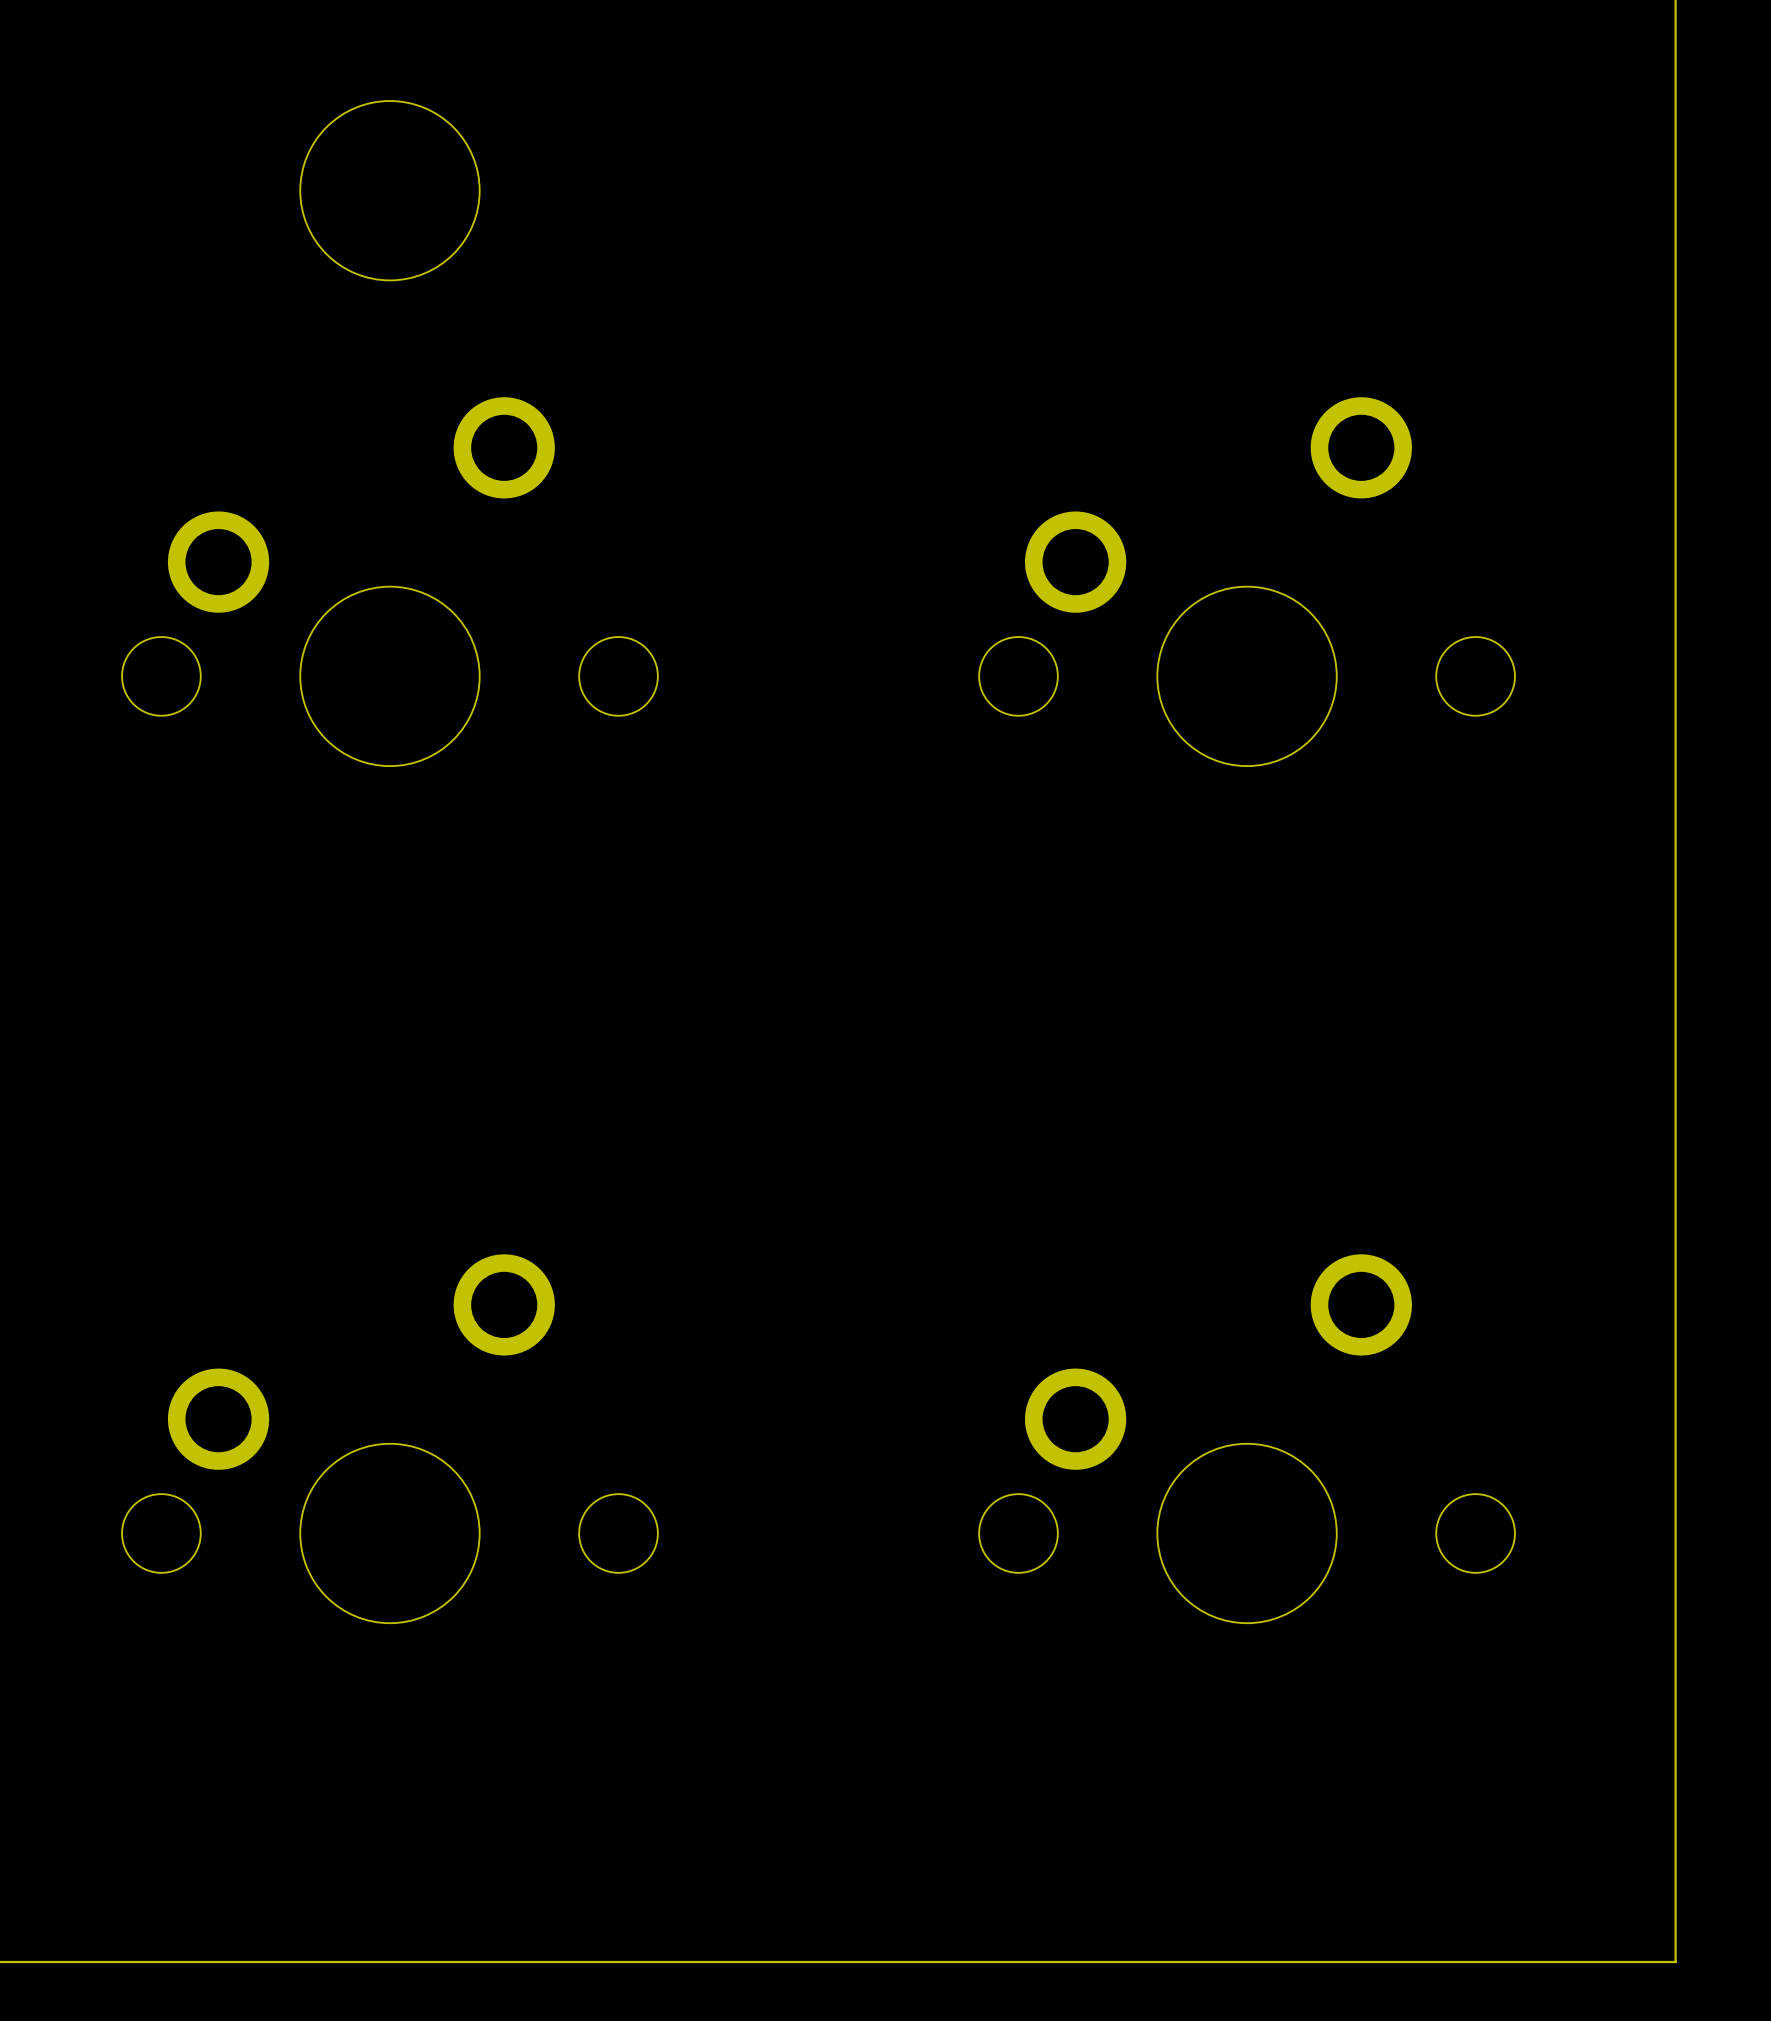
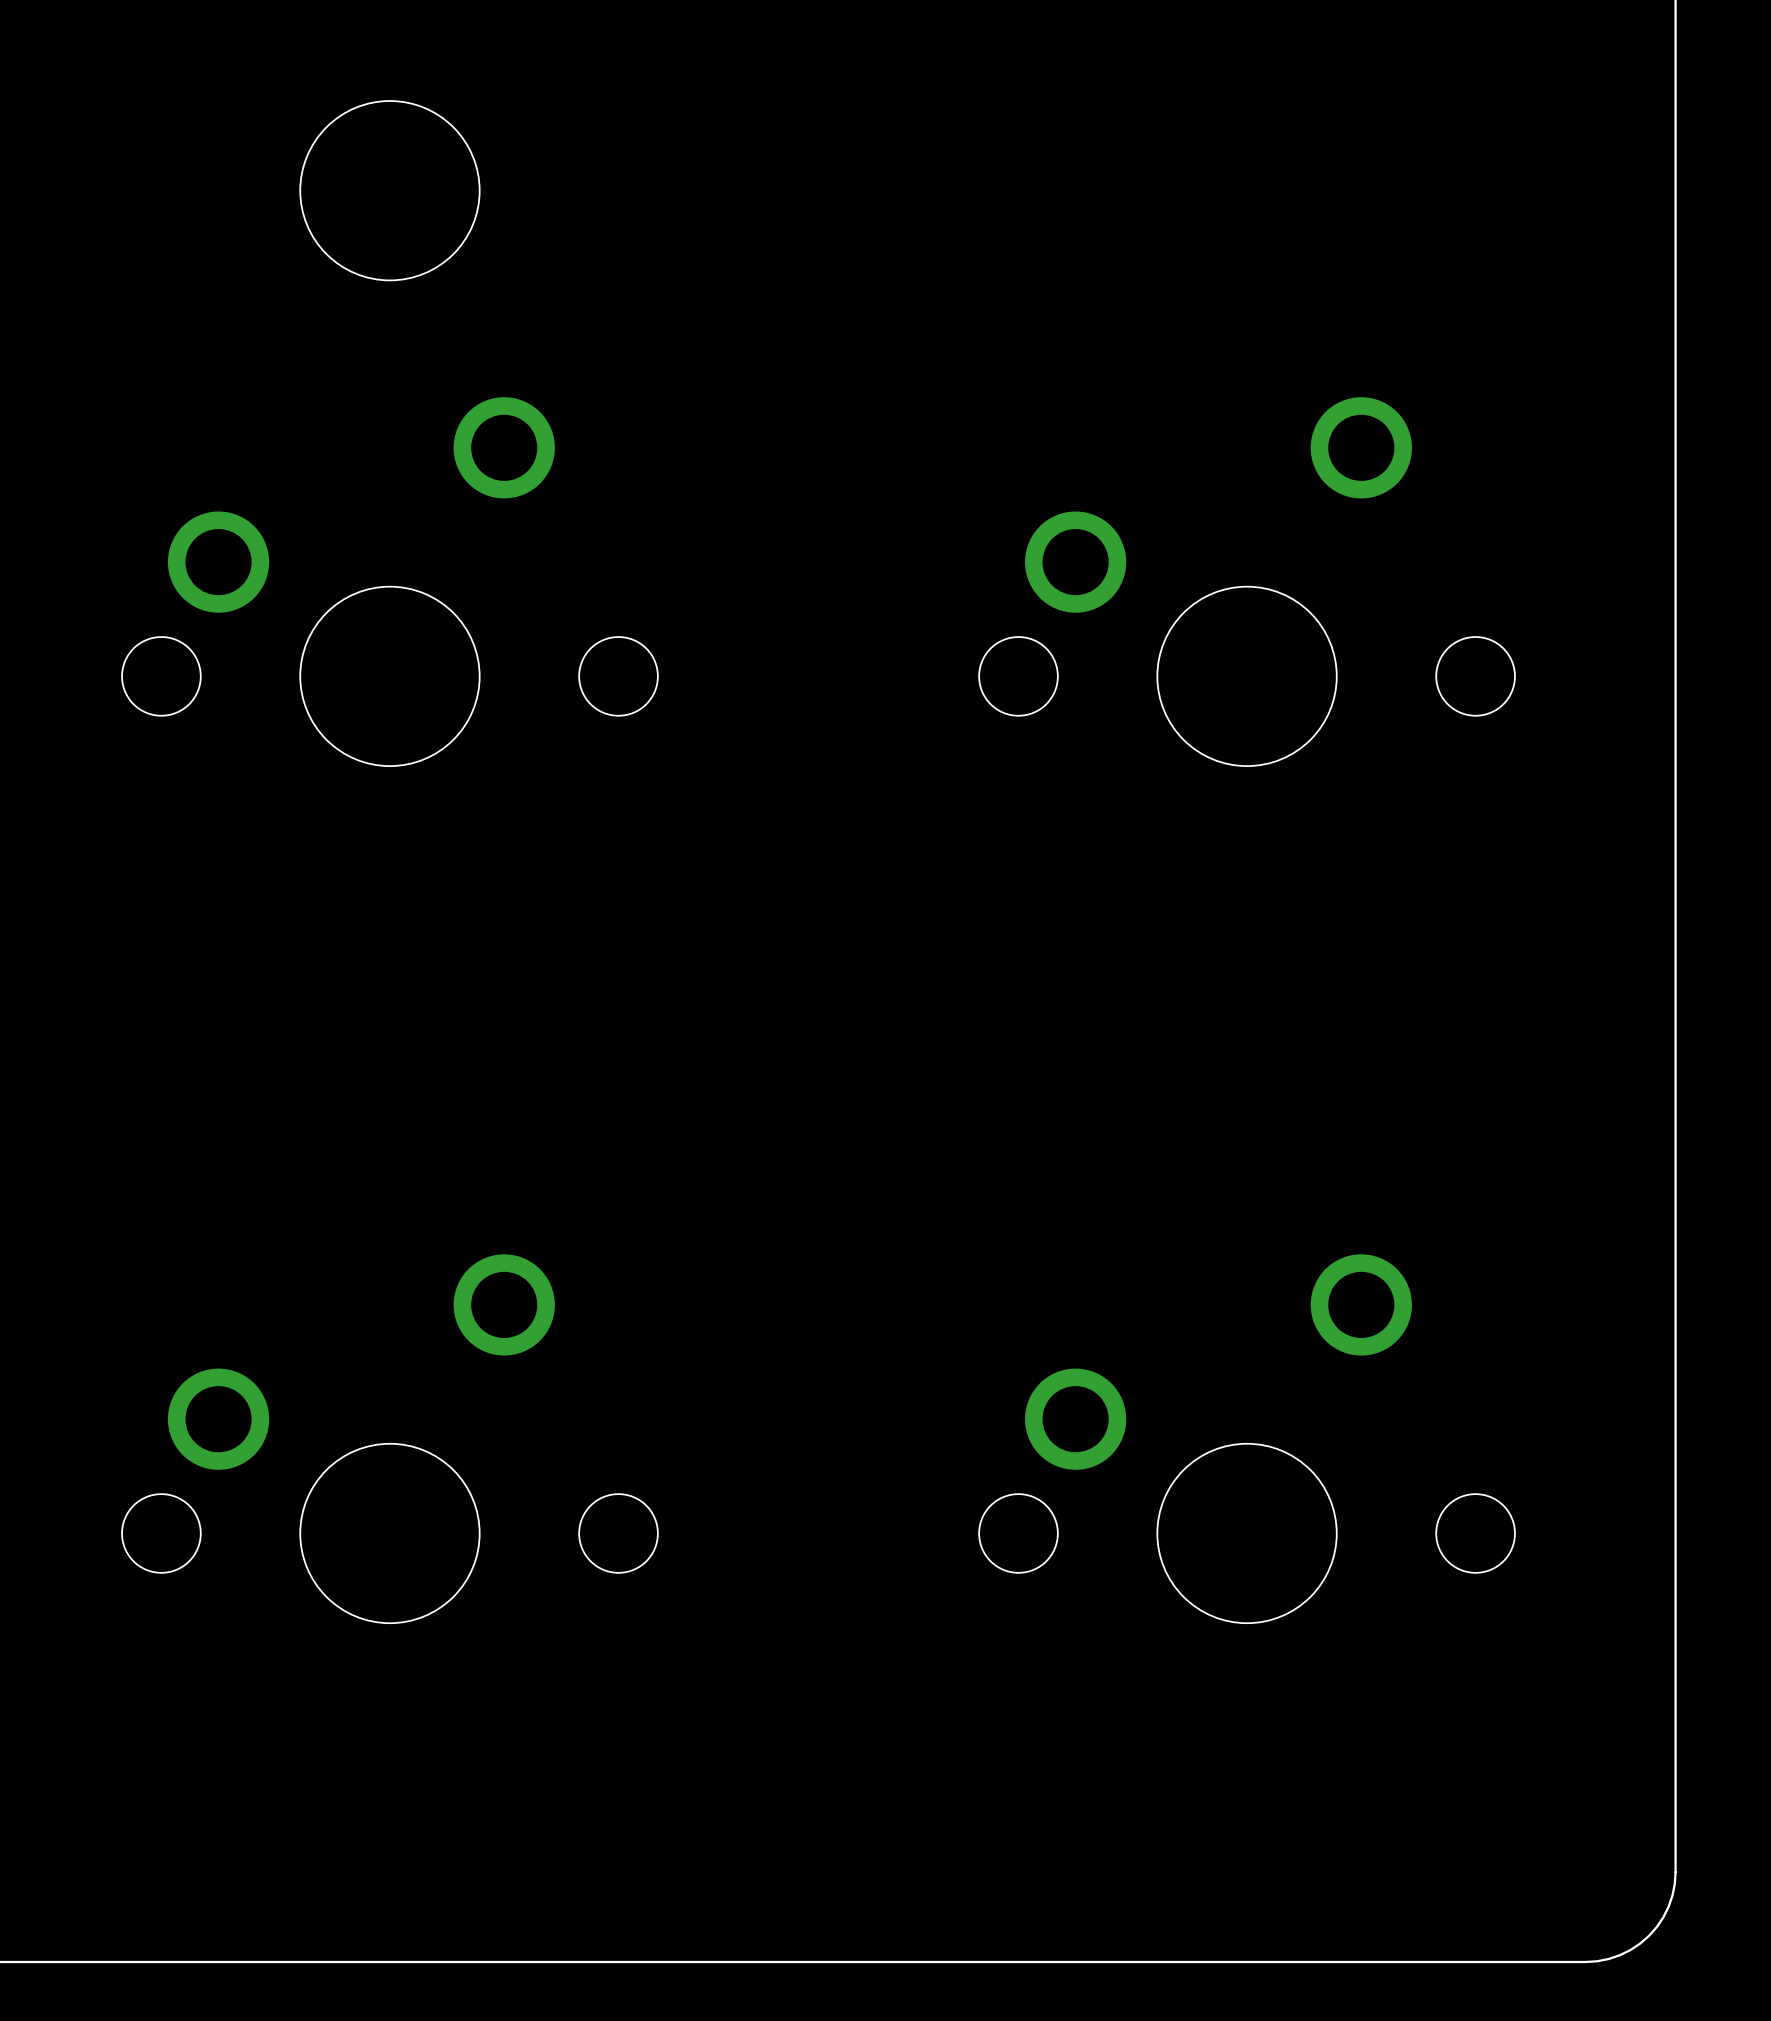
board edge: (1675, 1872) (1675, 1962) (1585, 1962) -> (1675, 1872) (1674, 1883) (1668, 1906) (1663, 1917) (1649, 1935) (1640, 1943) (1620, 1955) (1597, 1961) (1585, 1962)

